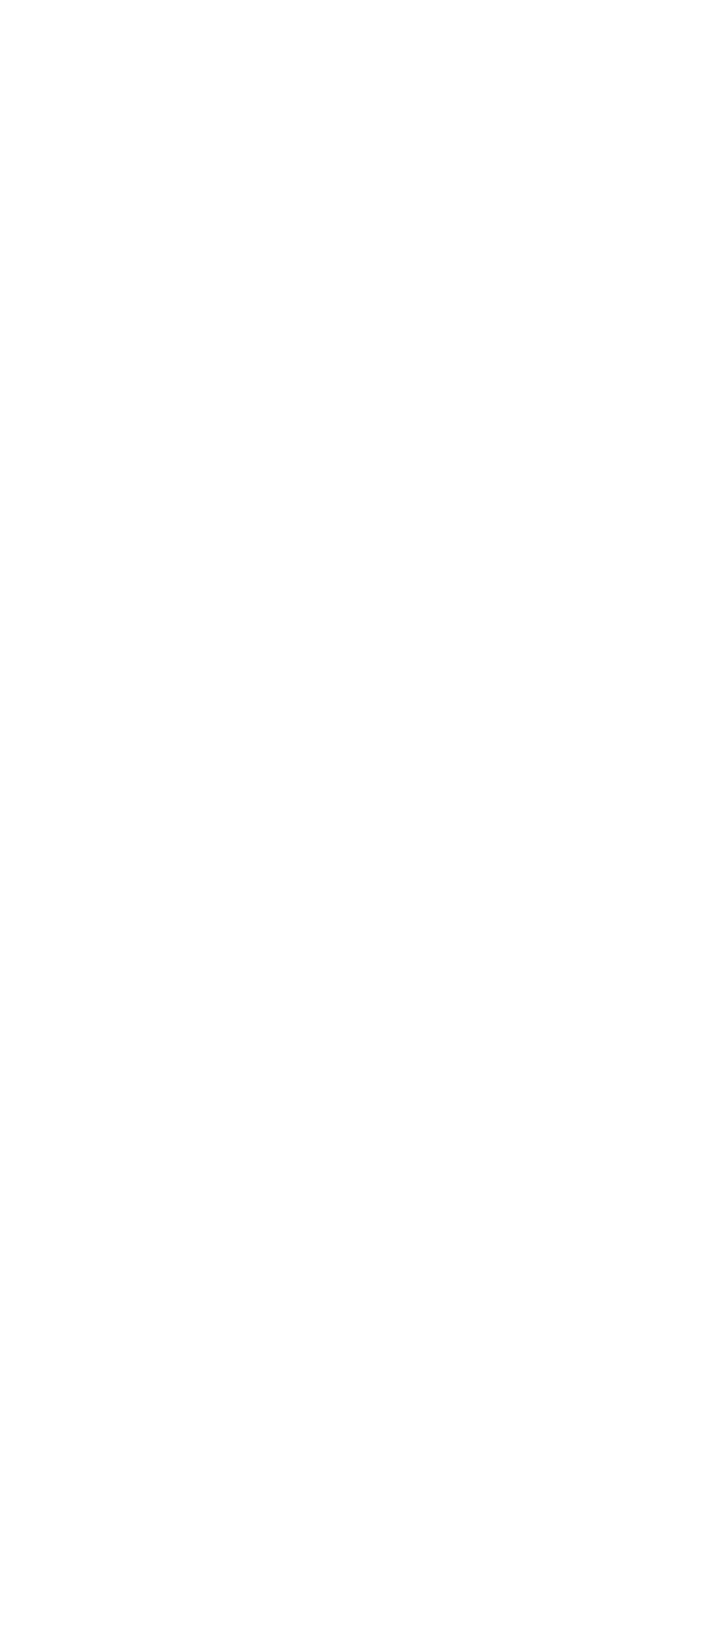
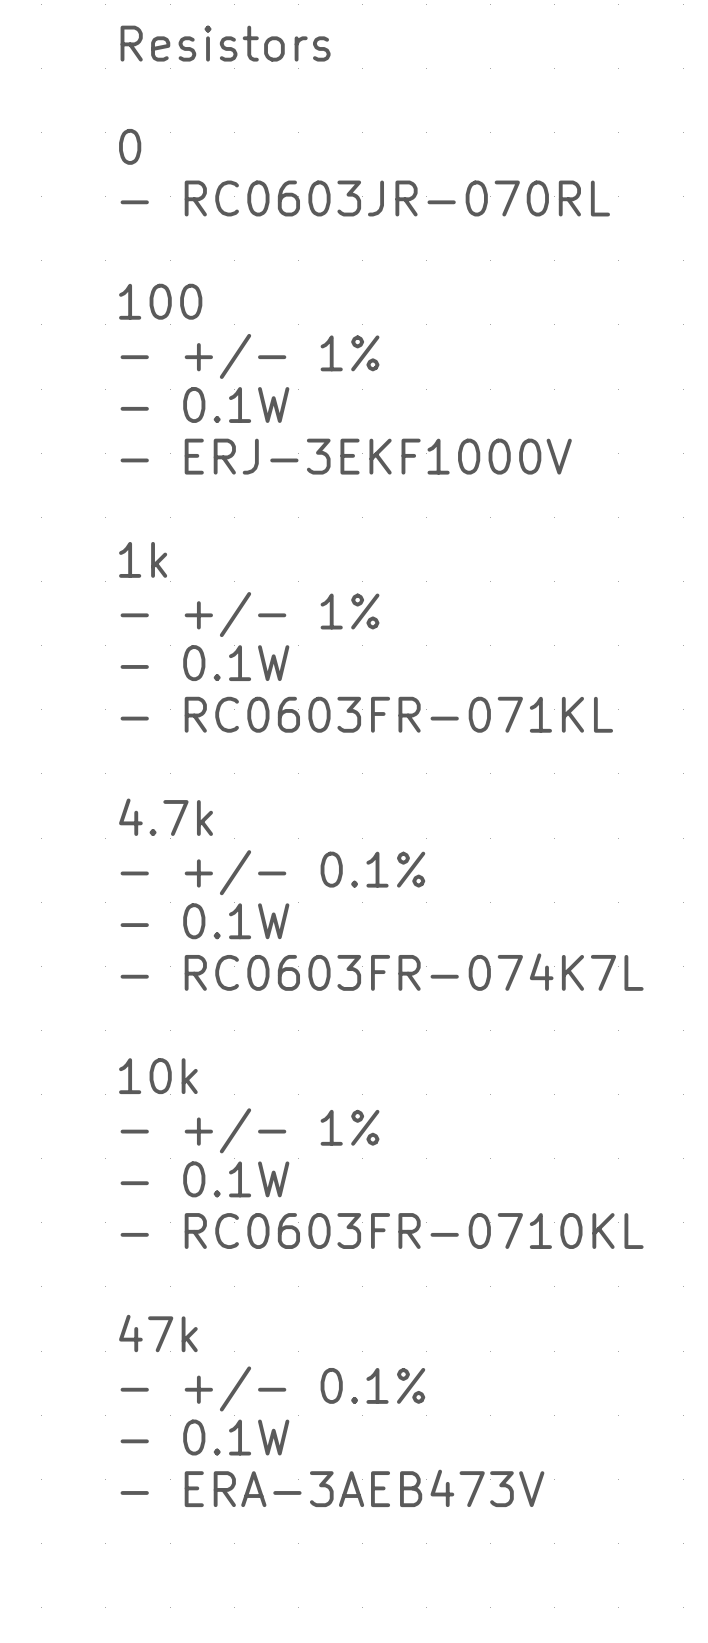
text: none -> Resistors (225, 43)
text: none -> 0 (130, 146)
text: none -> - RC0603JR-070RL (365, 198)
text: none -> 100 (160, 301)
text: none -> - +/- 1% (250, 356)
text: none -> - 0.1W (204, 405)
text: none -> - ERJ-3EKF1000V (346, 456)
text: none -> 1k (143, 559)
text: none -> - +/- 1% (250, 614)
text: none -> - 0.1W (204, 663)
text: none -> - RC0603FR-071KL (366, 714)
text: none -> 4.7k (166, 817)
text: none -> - +/- 0.1% (272, 872)
text: none -> - 0.1W (204, 921)
text: none -> - RC0603FR-074K7L (382, 972)
text: none -> 10k (158, 1076)
text: none -> - +/- 1% (250, 1130)
text: none -> - 0.1W (204, 1179)
text: none -> - RC0603FR-0710KL (382, 1231)
text: none -> 47k (158, 1333)
text: none -> - +/- 0.1% (272, 1388)
text: none -> - 0.1W (204, 1437)
text: none -> - ERA-3AEB473V (332, 1488)

